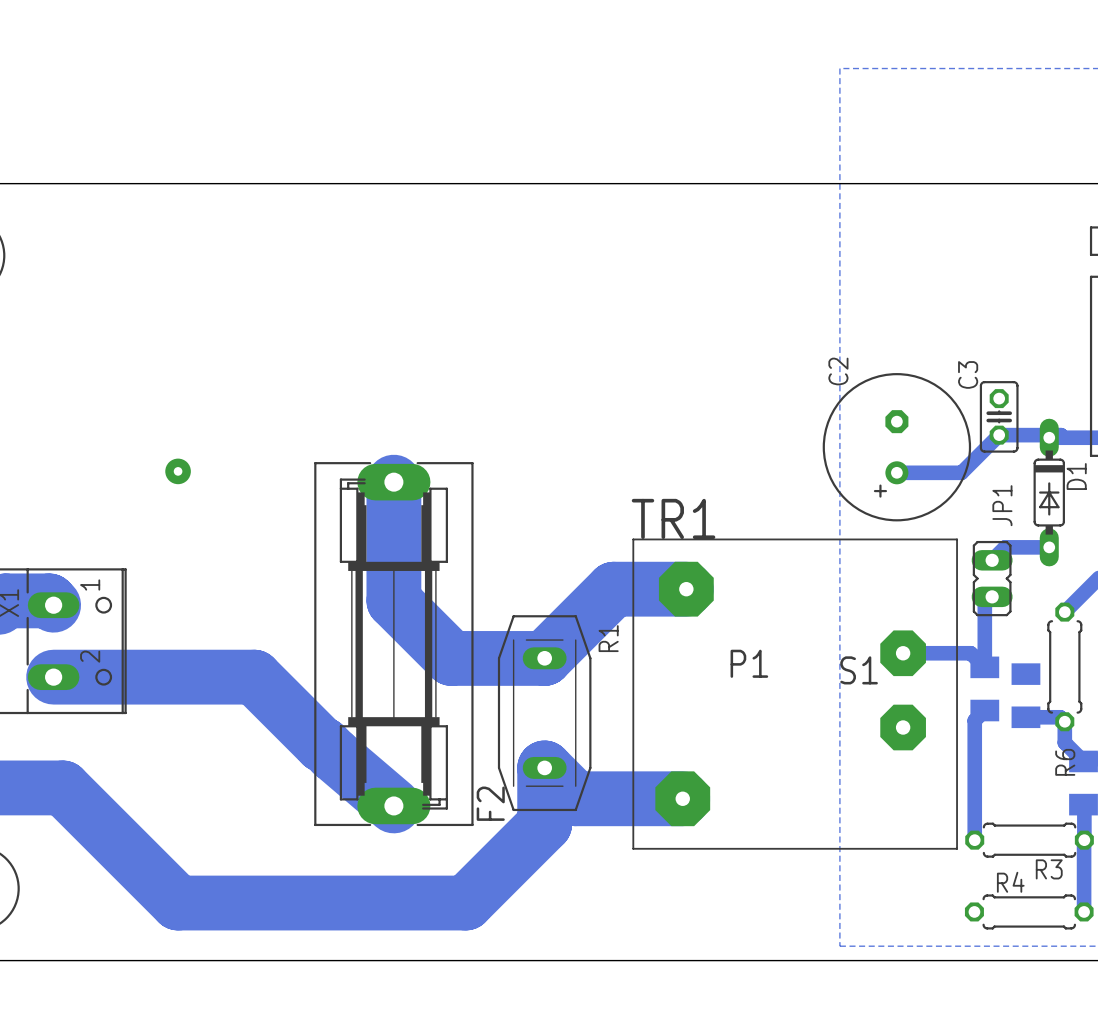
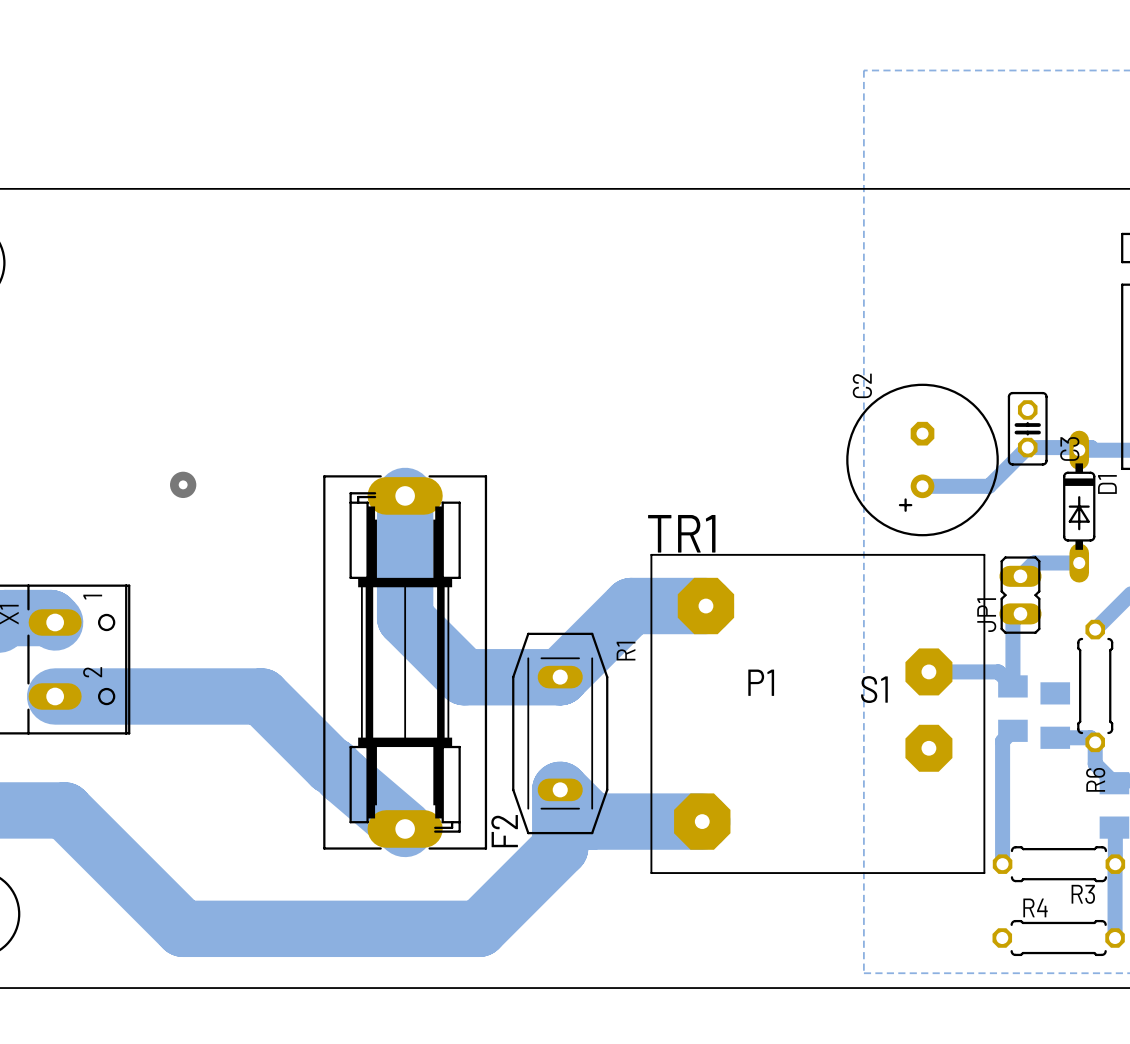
C3 name position: C3 (968, 374) -> C3 (1069, 448)
JP1 name position: JP1 (1002, 505) -> JP1 (986, 615)

